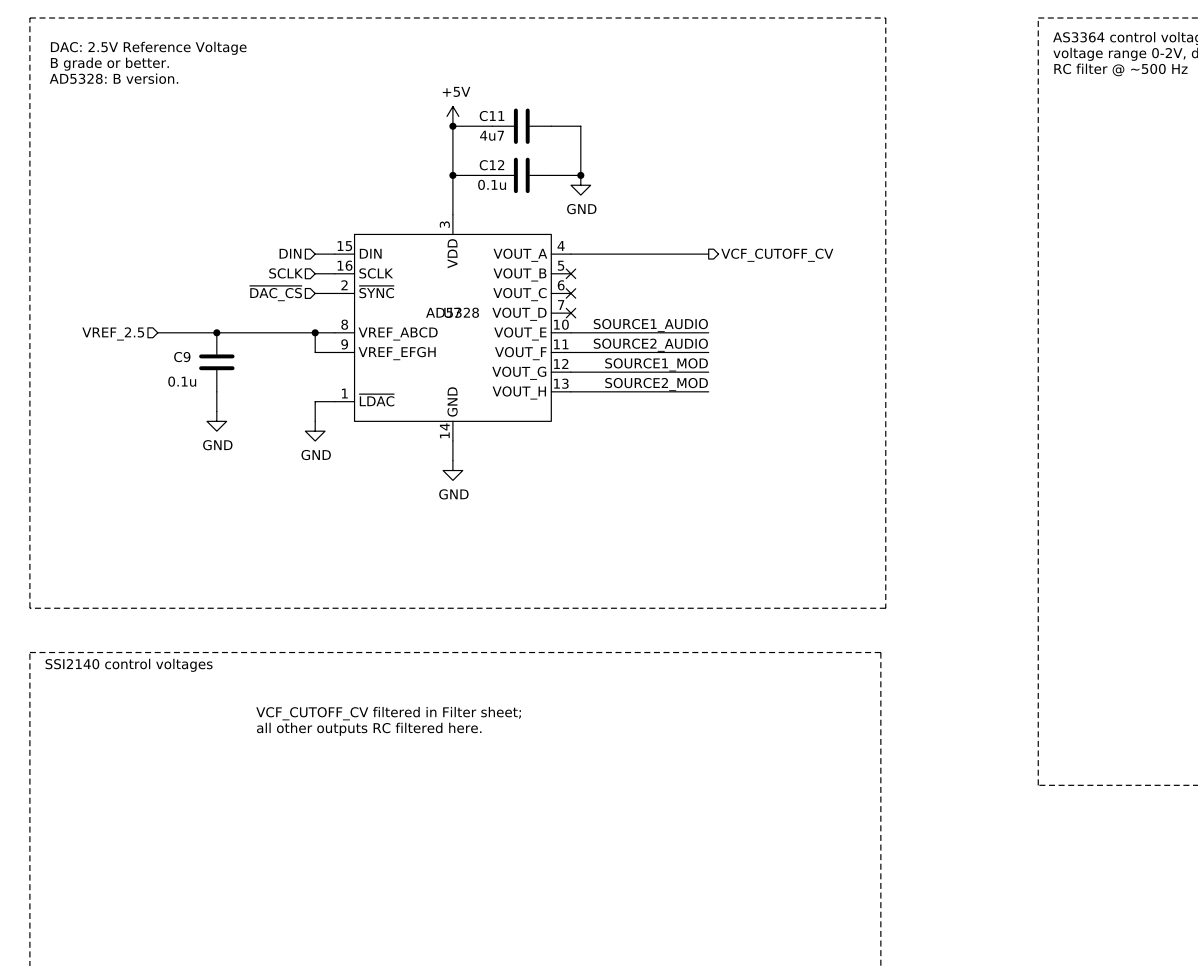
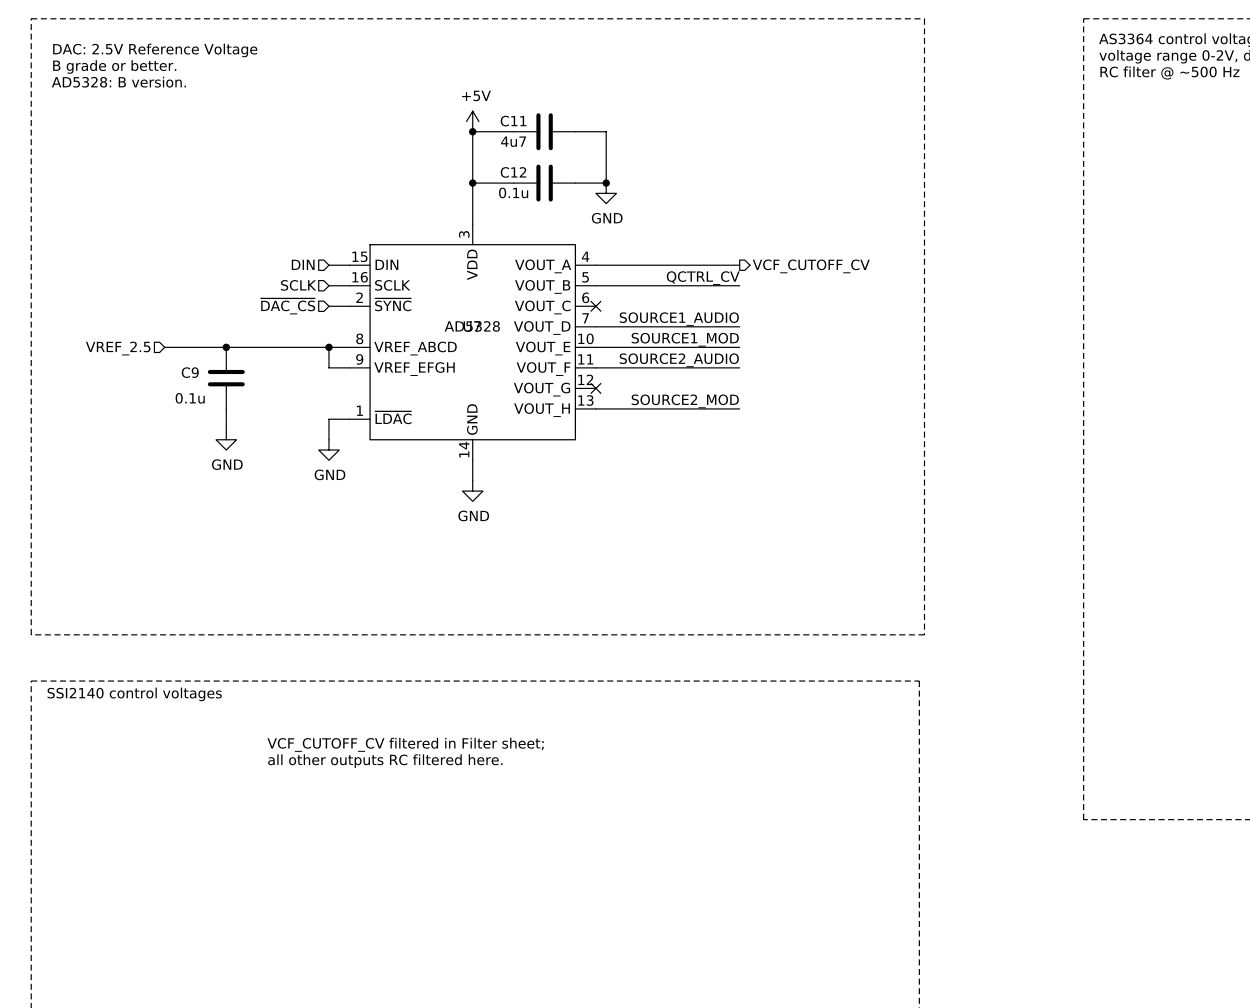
label: none -> QCTRL_CV (703, 278)
wire: none -> (595, 285) (739, 285)
no-connect mark: (570, 273) -> none
label: none -> SOURCE1_AUDIO (679, 319)
no-connect mark: (570, 313) -> none
label: SOURCE1_AUDIO (650, 325) -> SOURCE1_MOD (685, 339)
label: SOURCE1_MOD (656, 364) -> none
wire: (570, 372) (708, 372) -> (595, 326) (739, 326)
no-connect mark: none -> (595, 388)

